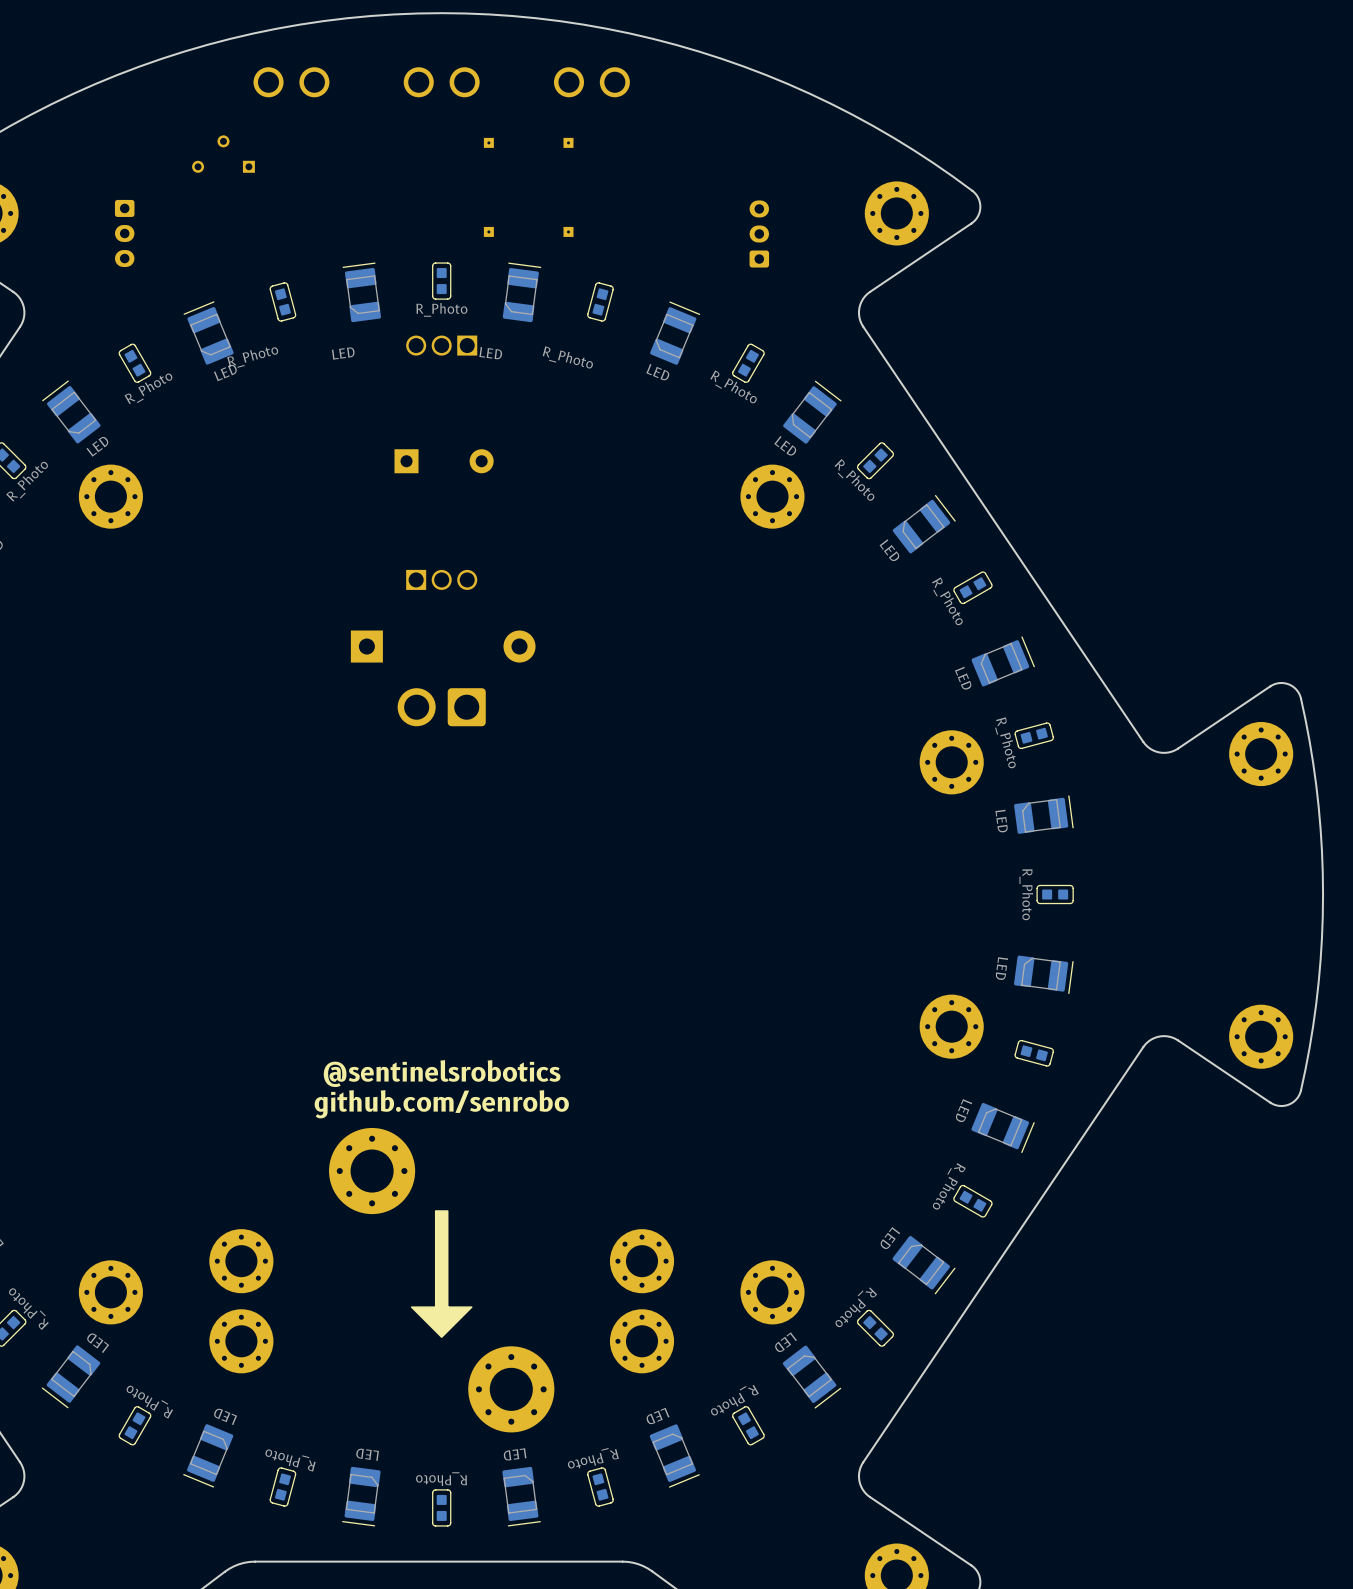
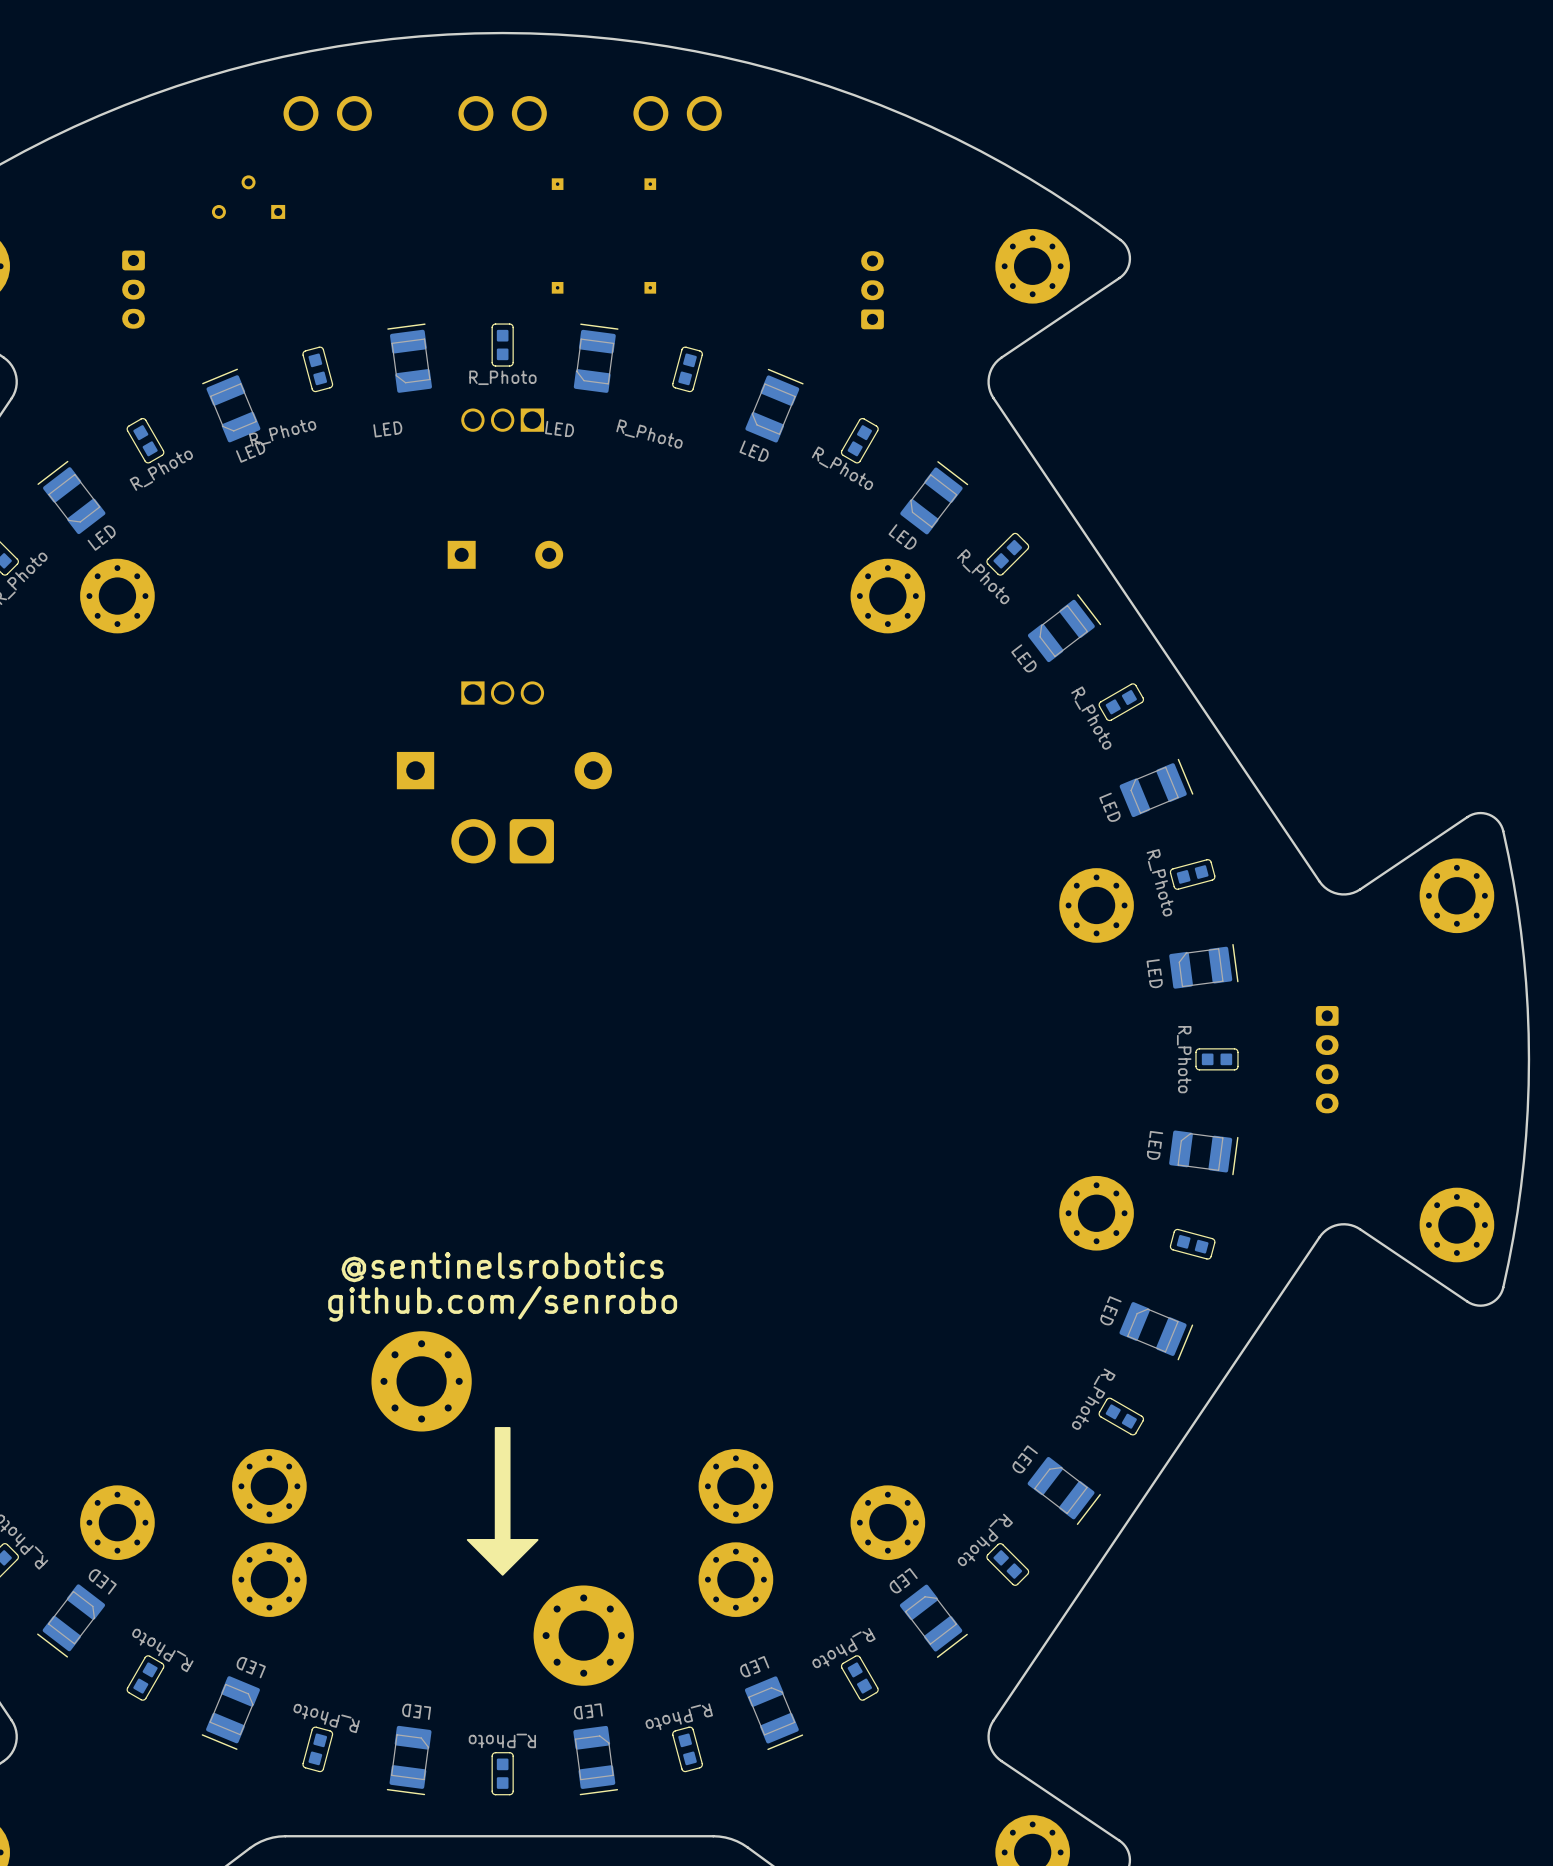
part: none -> (1327, 1059)

